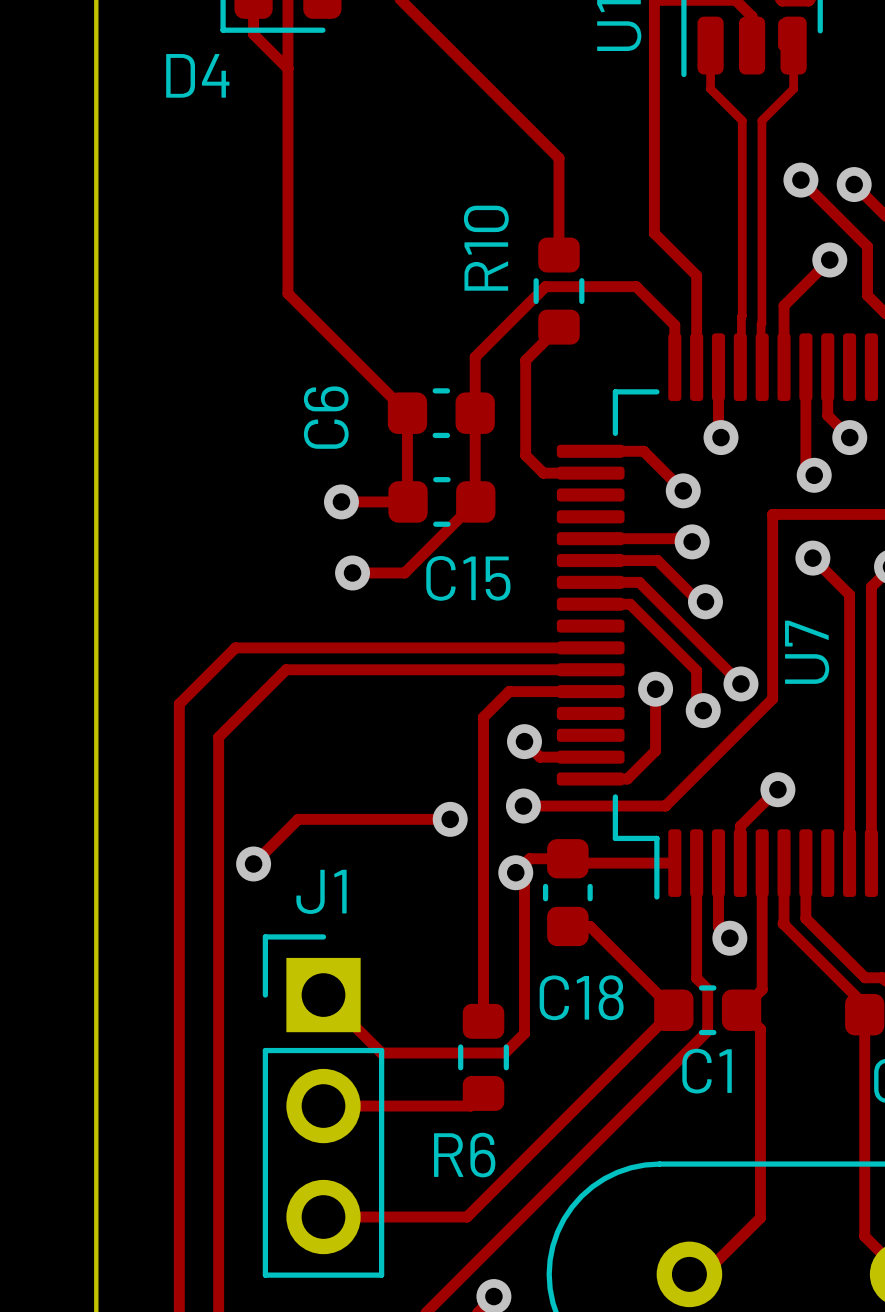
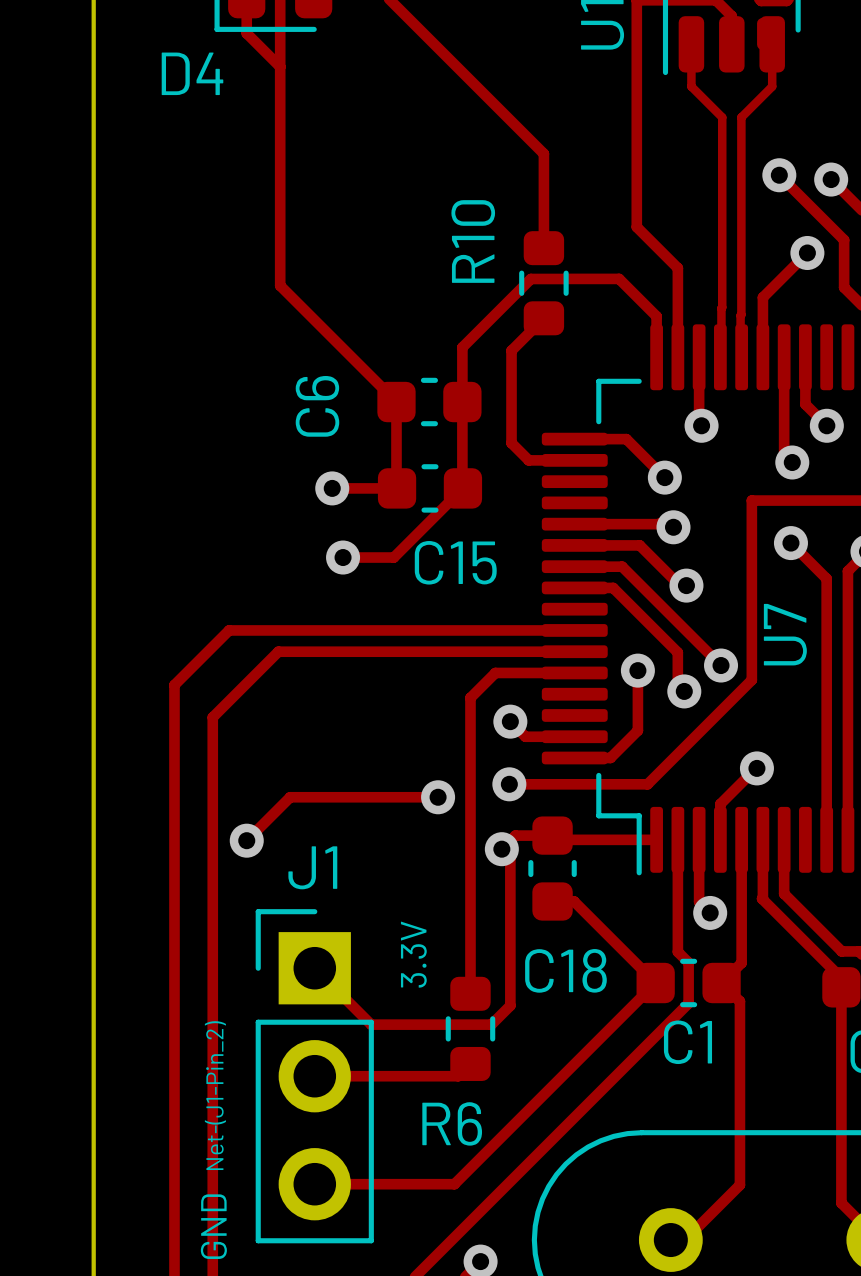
text: none -> 3.3V (413, 954)
text: none -> Net-(J1-Pin_2) (215, 1095)
text: none -> GND (213, 1226)

